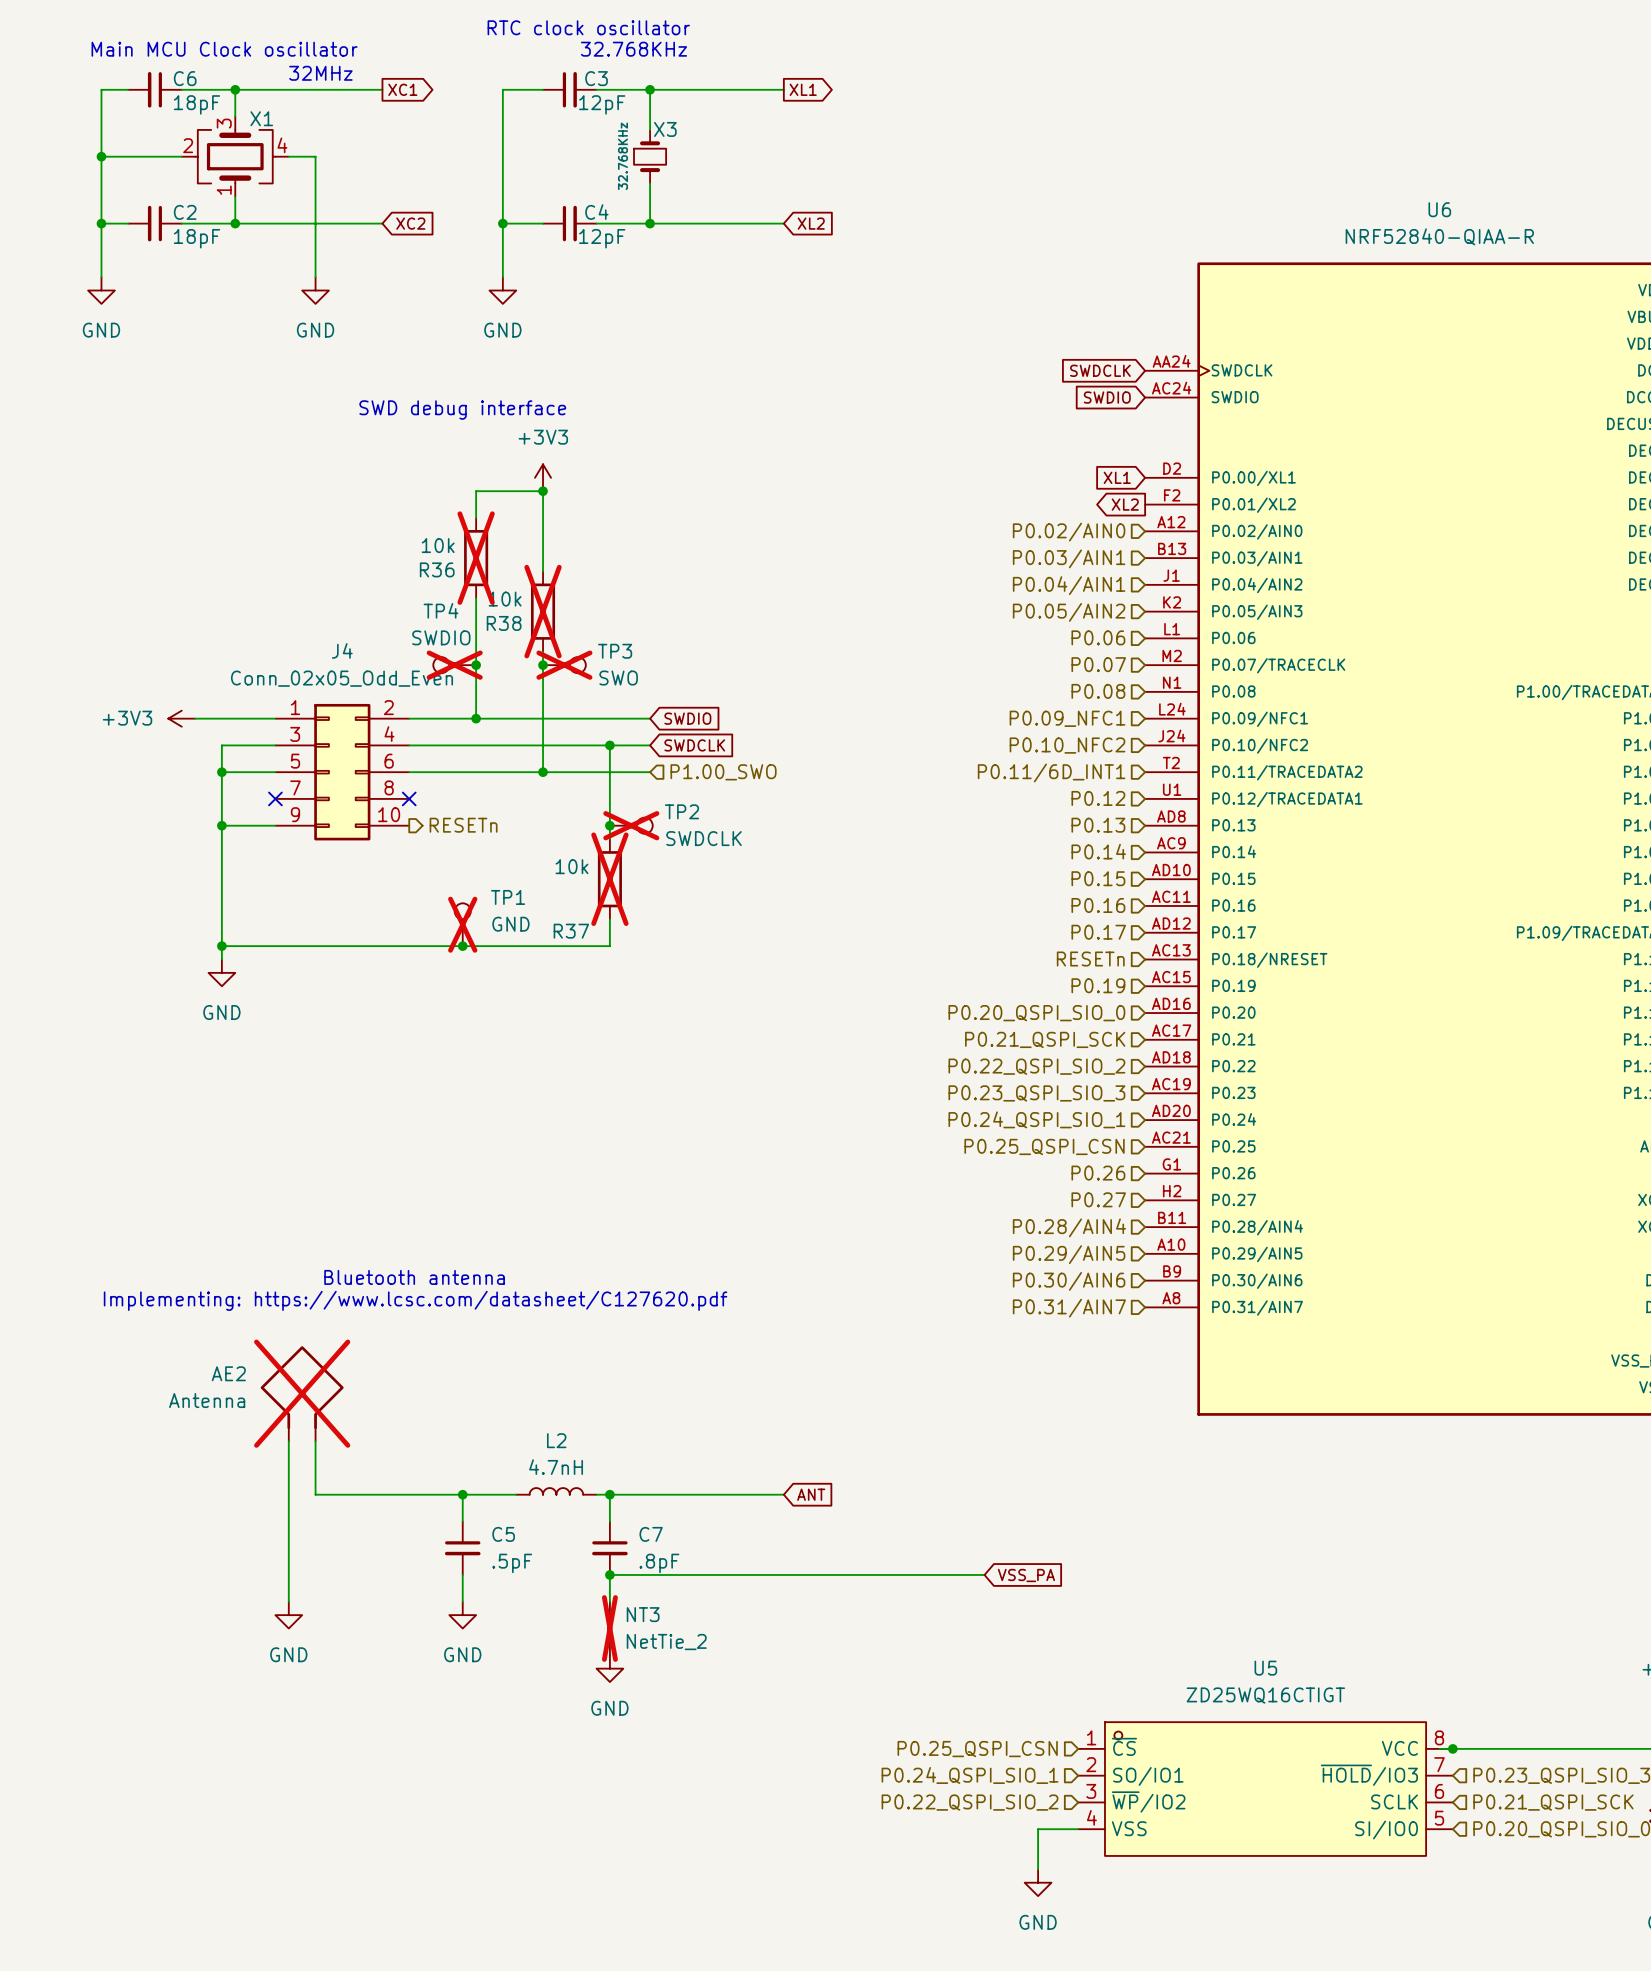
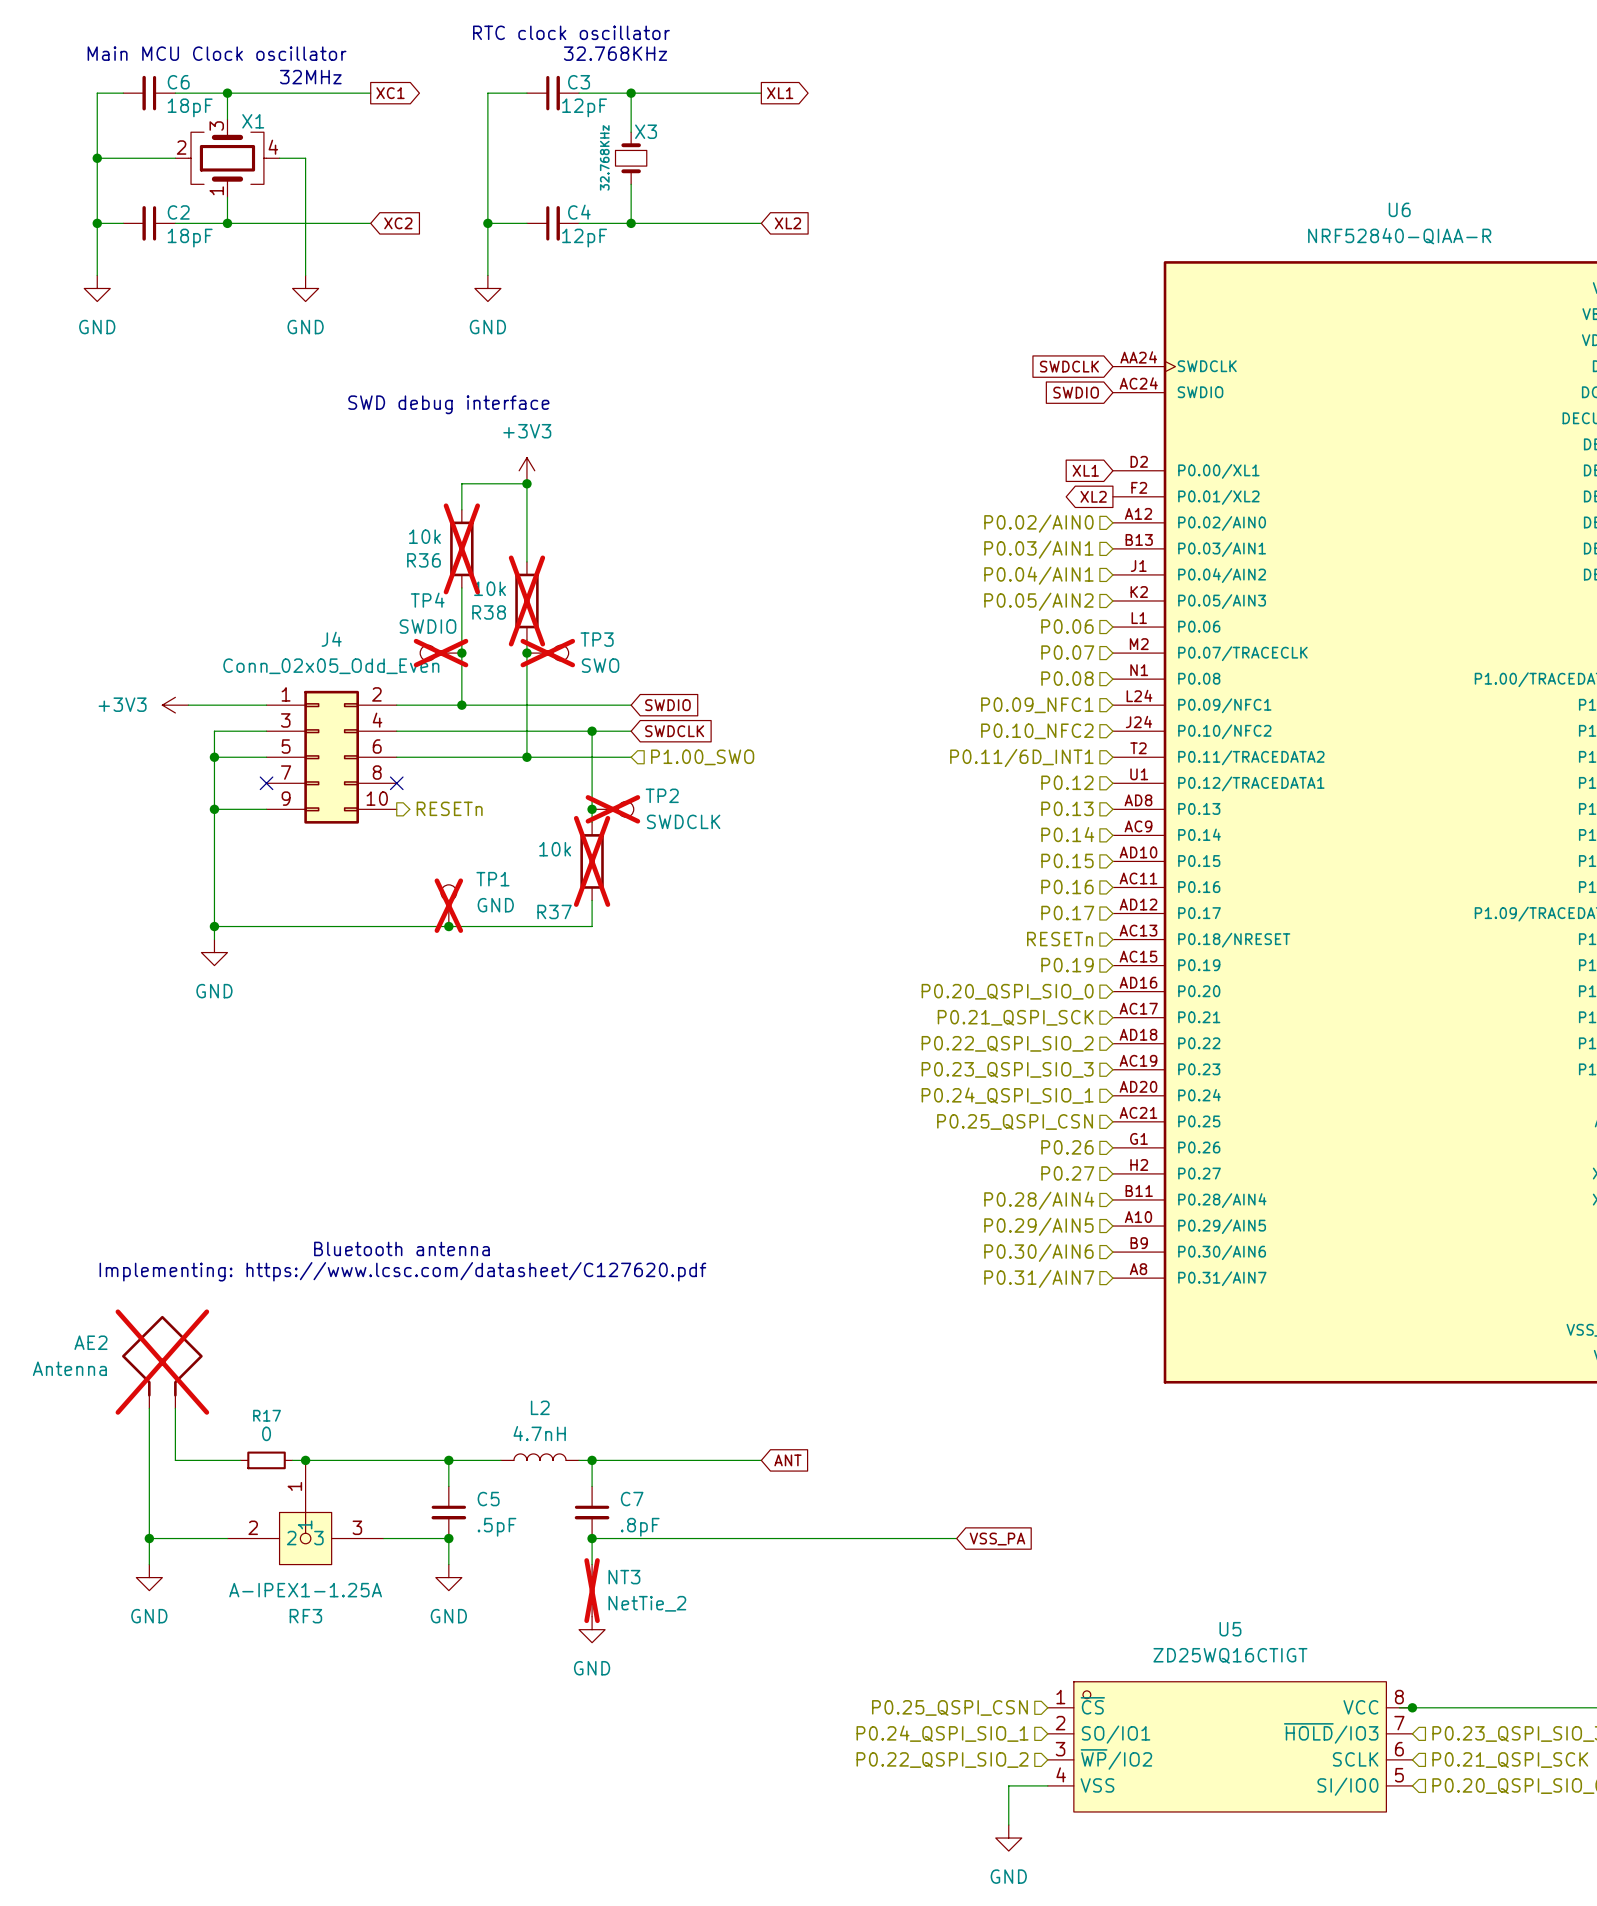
AE2 position: (302, 1393) -> (162, 1362)
wire: none -> (175, 1408) (175, 1460) (240, 1460)
wire: (288, 1441) (288, 1601) -> (149, 1408) (149, 1564)
wire: (315, 1441) (315, 1494) -> (292, 1460) (305, 1460)
R17: none -> 0 (266, 1460)
junction: none -> (305, 1460)
RF3: none -> A-IPEX1-1.25A (305, 1512)
wire: none -> (149, 1538) (227, 1538)
junction: none -> (149, 1538)
wire: none -> (383, 1538) (448, 1538)
junction: none -> (448, 1538)
power symbol position: GND (288, 1615) -> GND (149, 1577)

